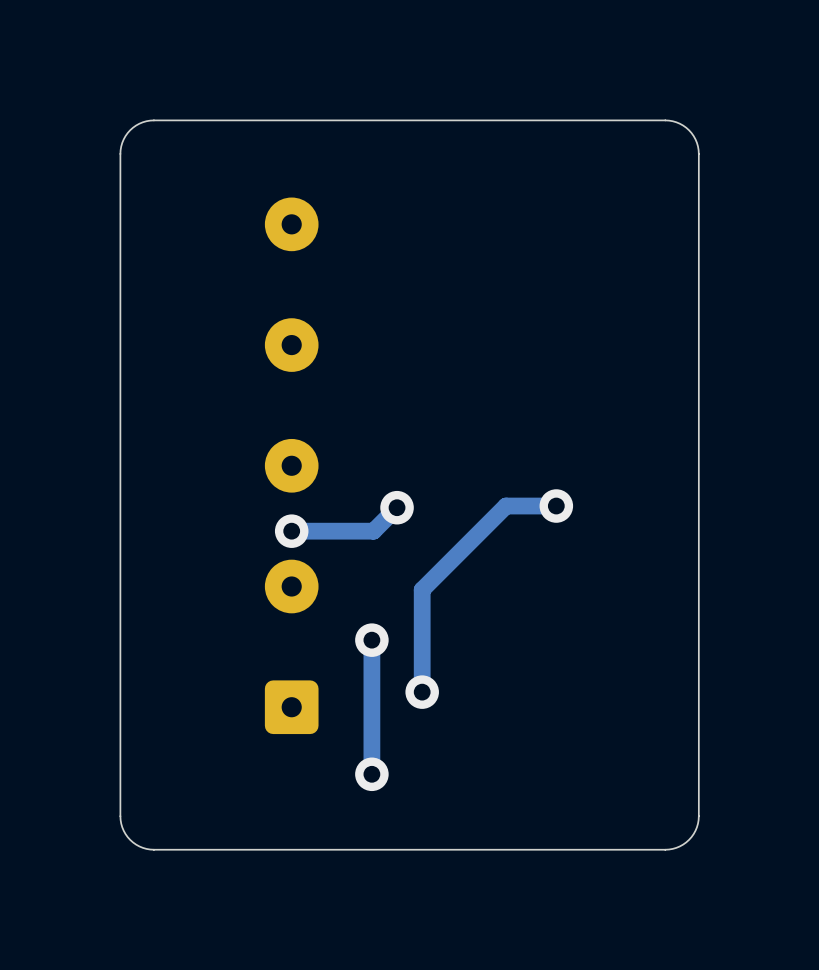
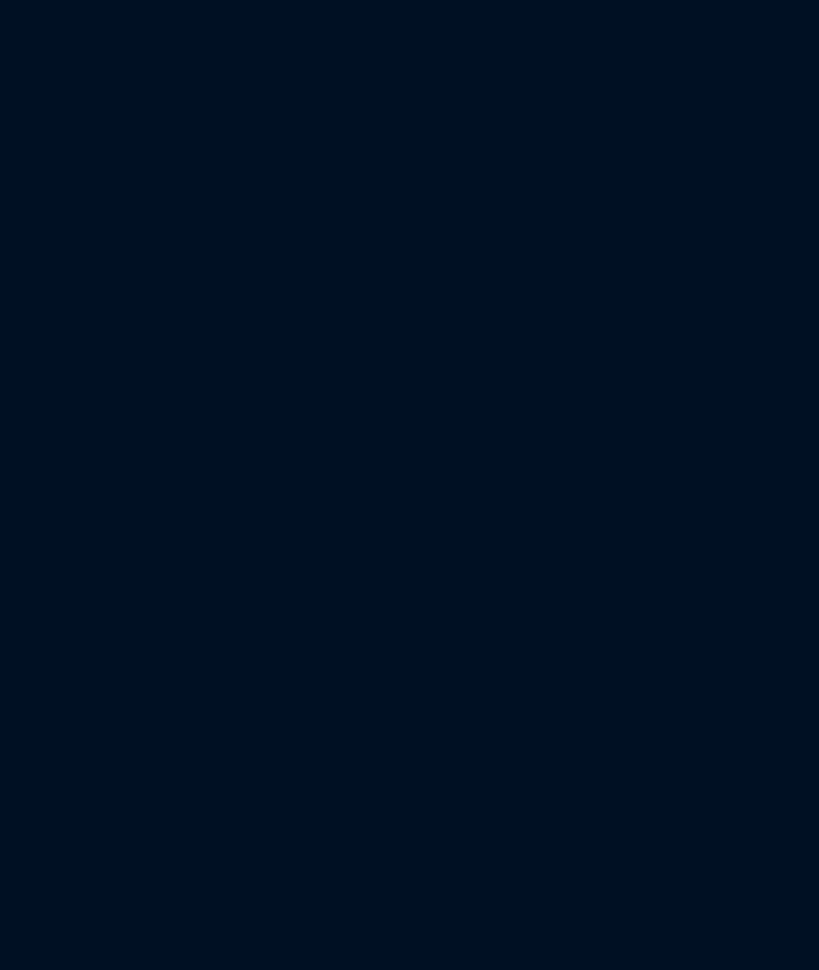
board edge: (665, 120) (153, 120) (139, 123) (127, 133) (122, 142) (120, 153) (120, 816) (123, 830) (133, 842) (142, 847) (153, 849) (665, 849) (679, 846) (691, 837) (696, 827) (698, 816) (698, 153) (695, 139) (689, 130) (679, 123) (665, 120) -> none
part: (291, 465) -> none
track: (556, 506) (506, 506) (422, 589) (422, 692) -> none
via: (556, 506) -> none
track: (397, 507) (373, 531) (291, 531) -> none
via: (397, 507) -> none
via: (291, 531) -> none
track: (371, 640) (371, 774) -> none
via: (371, 640) -> none
via: (422, 692) -> none
via: (371, 774) -> none

